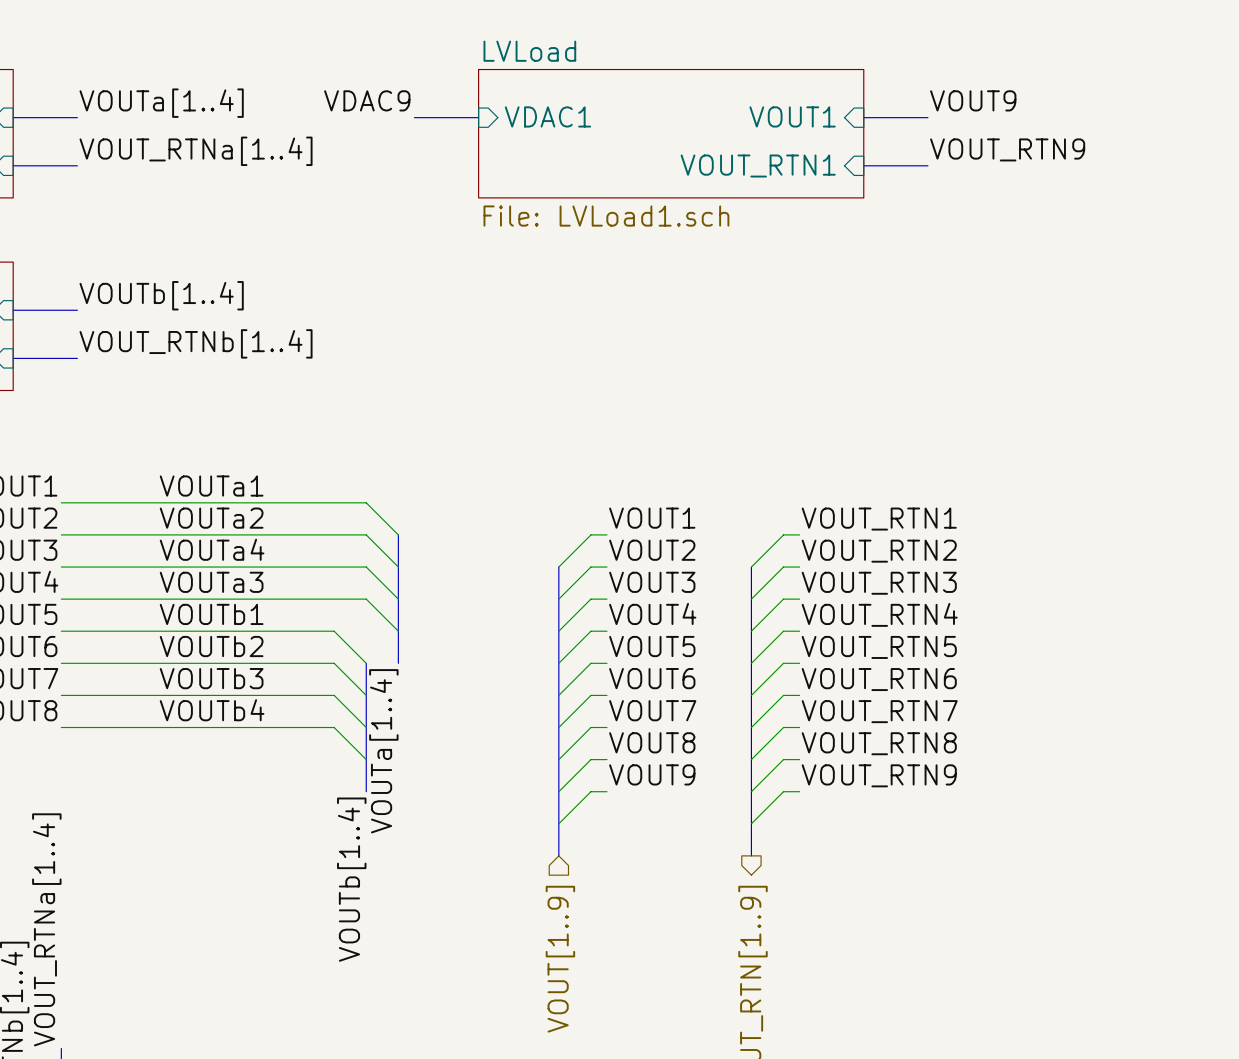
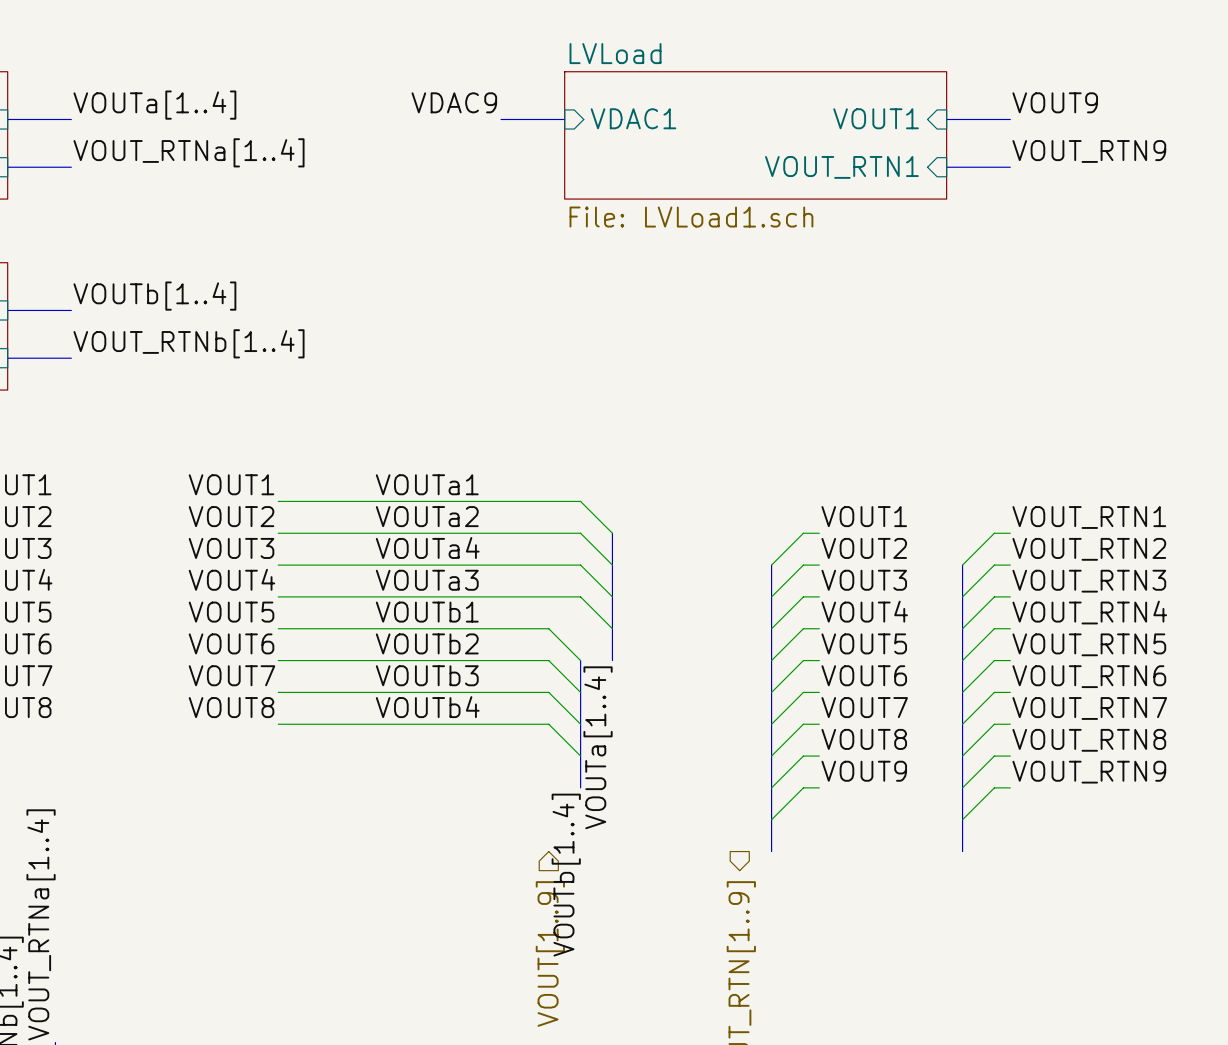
label position: VDAC9 (367, 100) -> VDAC9 (454, 102)
label position: VOUT9 (973, 100) -> VOUT9 (1055, 102)
sheet pin position: VDAC1 (547, 116) -> VDAC1 (633, 118)
sheet pin position: VOUT1 (792, 116) -> VOUT1 (876, 118)
bus: (414, 117) (478, 117) -> (501, 119) (564, 119)
bus: (863, 117) (927, 117) -> (946, 119) (1010, 119)
sheet LVLoad position: (671, 133) -> (755, 135)
label position: VOUT_RTN9 (1007, 149) -> VOUT_RTN9 (1089, 151)
bus: (863, 165) (927, 165) -> (946, 167) (1010, 167)
sheet pin position: VOUT_RTN1 (758, 166) -> VOUT_RTN1 (841, 167)
label position: VOUTa1 (211, 486) -> VOUTa1 (427, 484)
label: none -> VOUT1 (231, 484)
wire: (61, 502) (286, 502) -> none
wire: (366, 502) (398, 534) -> (357, 501) (580, 501) (612, 533)
label position: VOUTa2 (211, 518) -> VOUTa2 (427, 516)
label: none -> VOUT2 (231, 516)
label: VOUT1 (652, 518) -> none
label: none -> VOUT1 (864, 516)
label position: VOUT_RTN1 (879, 519) -> VOUT_RTN1 (1089, 517)
wire: (61, 534) (286, 534) -> none
wire: (366, 534) (398, 567) -> (357, 533) (580, 533) (612, 565)
bus: (398, 534) (398, 663) -> (612, 533) (612, 660)
wire: (606, 534) (590, 534) (558, 567) -> (819, 533) (803, 533) (771, 565)
wire: (799, 534) (783, 534) (751, 567) -> (1010, 533) (994, 533) (962, 565)
label position: VOUTa4 (212, 549) -> VOUTa4 (427, 547)
label: none -> VOUT3 (231, 548)
label: VOUT2 (652, 550) -> none
label: none -> VOUT2 (864, 548)
label position: VOUT_RTN2 (879, 551) -> VOUT_RTN2 (1089, 549)
wire: (61, 567) (286, 567) -> none
wire: (366, 567) (398, 599) -> (357, 565) (580, 565) (612, 596)
bus: (558, 567) (558, 855) -> (771, 565) (771, 851)
wire: (606, 567) (590, 567) (558, 599) -> (819, 565) (803, 565) (771, 596)
bus: (751, 567) (751, 855) -> (962, 565) (962, 851)
wire: (799, 567) (783, 567) (751, 599) -> (1010, 565) (994, 565) (962, 596)
label: none -> VOUT4 (231, 579)
label position: VOUTa3 (211, 582) -> VOUTa3 (427, 580)
label: VOUT3 (652, 582) -> none
label: none -> VOUT3 (864, 580)
label position: VOUT_RTN3 (879, 583) -> VOUT_RTN3 (1089, 581)
wire: (61, 599) (286, 599) -> none
wire: (366, 599) (398, 631) -> (357, 596) (580, 596) (612, 628)
wire: (606, 599) (590, 599) (558, 631) -> (819, 596) (803, 596) (771, 628)
wire: (799, 599) (783, 599) (751, 631) -> (1010, 596) (994, 596) (962, 628)
label: VOUT4 (652, 613) -> none
label: none -> VOUT4 (864, 611)
label position: VOUTb1 (211, 614) -> VOUTb1 (427, 612)
label: none -> VOUT5 (231, 612)
label position: VOUT_RTN4 (879, 614) -> VOUT_RTN4 (1089, 612)
wire: (61, 631) (286, 631) -> none
wire: (334, 631) (366, 663) -> (325, 628) (548, 628) (580, 660)
wire: (606, 631) (590, 631) (558, 663) -> (819, 628) (803, 628) (771, 660)
wire: (799, 631) (783, 631) (751, 663) -> (1010, 628) (994, 628) (962, 660)
label position: VOUTb2 (211, 646) -> VOUTb2 (427, 643)
label: none -> VOUT6 (231, 643)
label: VOUT5 (652, 646) -> none
label: none -> VOUT5 (864, 643)
label position: VOUT_RTN5 (879, 647) -> VOUT_RTN5 (1089, 644)
wire: (61, 663) (286, 663) -> none
wire: (334, 663) (366, 695) -> (325, 660) (548, 660) (580, 692)
bus: (366, 663) (366, 791) -> (580, 660) (580, 787)
wire: (606, 663) (590, 663) (558, 695) -> (819, 660) (803, 660) (771, 692)
wire: (799, 663) (783, 663) (751, 695) -> (1010, 660) (994, 660) (962, 692)
label position: VOUTb3 (211, 678) -> VOUTb3 (427, 675)
label: none -> VOUT7 (231, 675)
label: VOUT6 (652, 678) -> none
label: none -> VOUT6 (864, 675)
label position: VOUT_RTN6 (879, 679) -> VOUT_RTN6 (1089, 676)
wire: (61, 695) (286, 695) -> none
wire: (334, 695) (366, 727) -> (325, 692) (548, 692) (580, 724)
wire: (606, 695) (590, 695) (558, 727) -> (819, 692) (803, 692) (771, 724)
wire: (799, 695) (783, 695) (751, 727) -> (1010, 692) (994, 692) (962, 724)
label position: VOUTb4 (212, 710) -> VOUTb4 (427, 707)
label: none -> VOUT8 (231, 707)
label: VOUT7 (652, 710) -> none
label: none -> VOUT7 (864, 707)
label position: VOUT_RTN7 (879, 711) -> VOUT_RTN7 (1089, 708)
wire: (61, 727) (286, 727) -> none
wire: (334, 727) (366, 759) -> (325, 724) (548, 724) (580, 756)
wire: (606, 727) (590, 727) (558, 759) -> (819, 724) (803, 724) (771, 756)
wire: (799, 727) (783, 727) (751, 759) -> (1010, 724) (994, 724) (962, 756)
label: VOUT8 (652, 742) -> none
label: none -> VOUT8 (864, 739)
label position: VOUT_RTN8 (879, 743) -> VOUT_RTN8 (1089, 740)
label position: VOUTa[1..4] (383, 751) -> VOUTa[1..4] (598, 747)
wire: (606, 759) (590, 759) (558, 791) -> (819, 756) (803, 756) (771, 787)
wire: (799, 759) (783, 759) (751, 791) -> (1010, 756) (994, 756) (962, 787)
label position: VOUT9 (652, 774) -> VOUT9 (864, 771)
label position: VOUT_RTN9 (879, 775) -> VOUT_RTN9 (1089, 772)
wire: (606, 791) (590, 791) (558, 823) -> (819, 787) (803, 787) (771, 819)
wire: (799, 791) (783, 791) (751, 823) -> (1010, 787) (994, 787) (962, 819)
label position: VOUTb[1..4] (351, 879) -> VOUTb[1..4] (566, 875)

